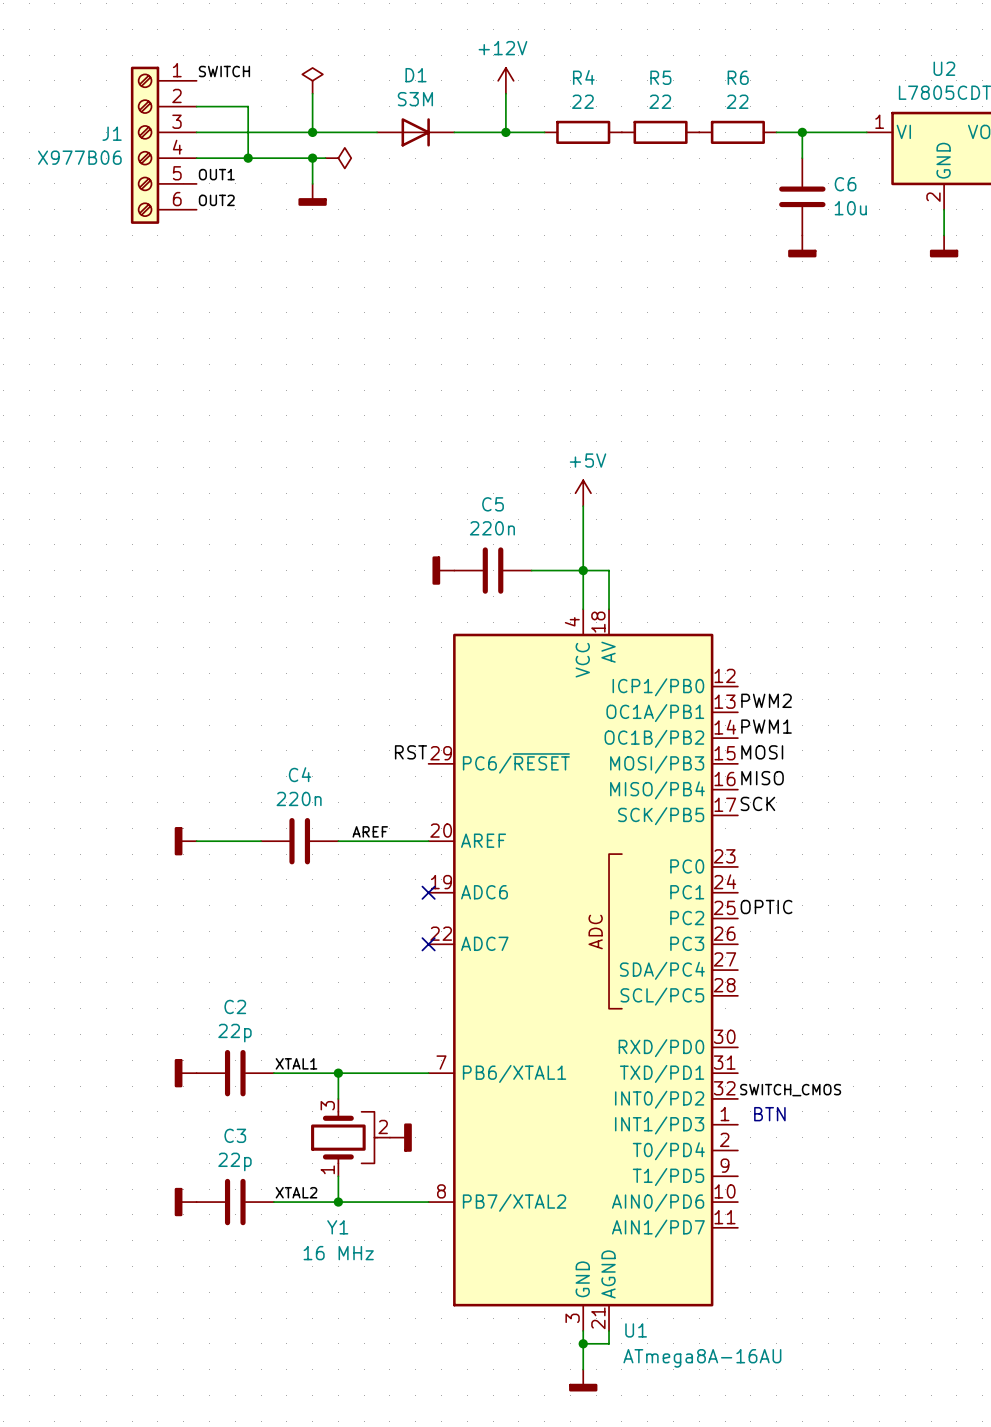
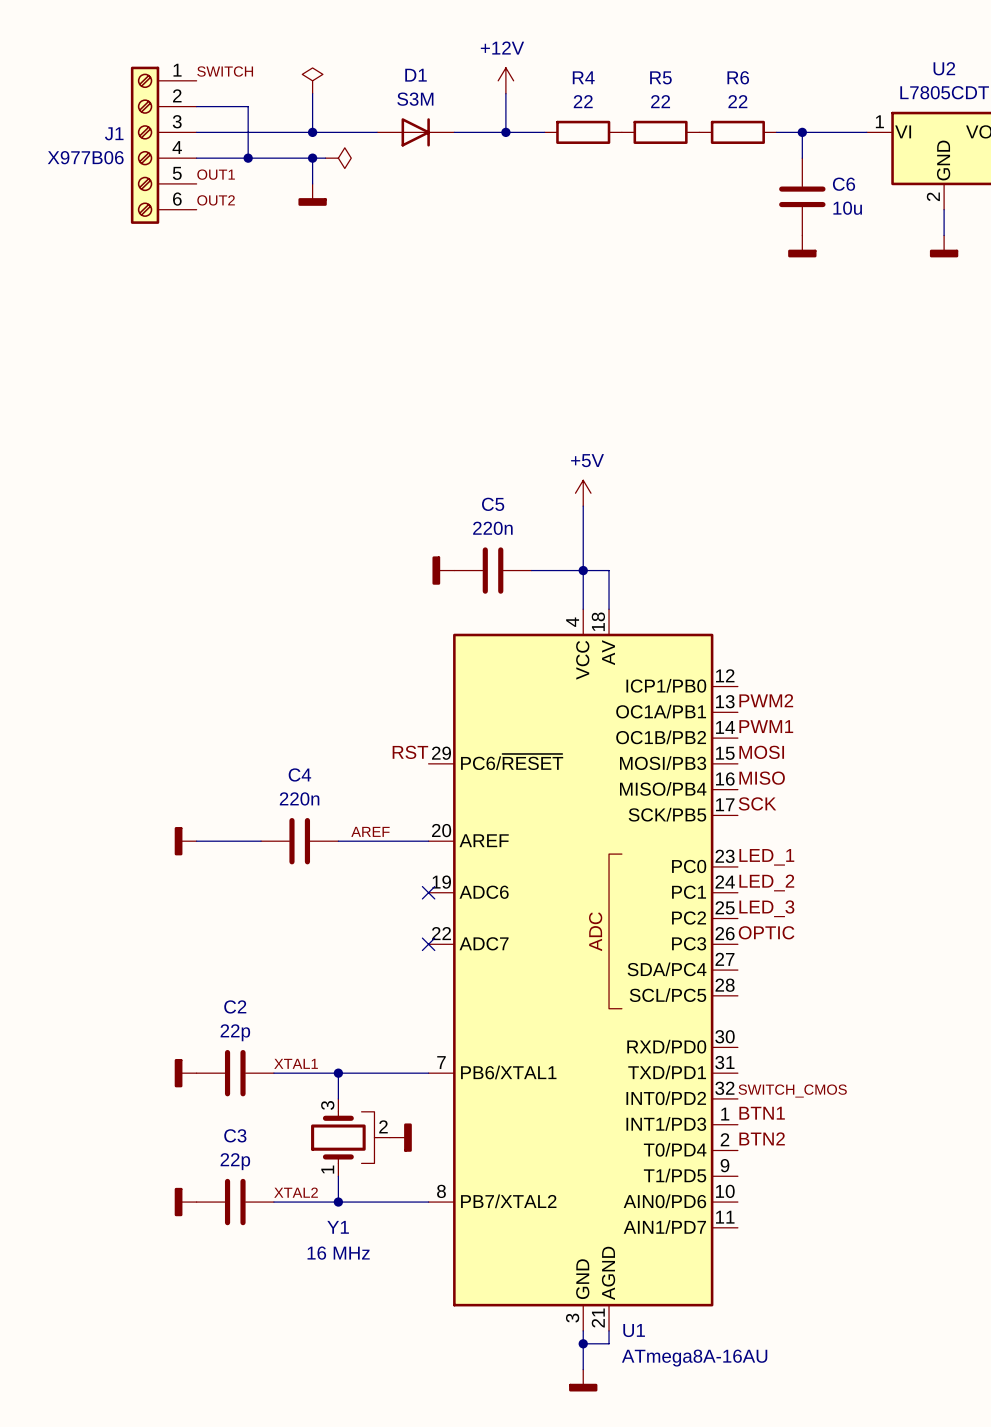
label: none -> LED_1 (766, 857)
label: none -> LED_2 (766, 883)
label: OPTIC (766, 907) -> LED_3 (766, 908)
label: none -> OPTIC (766, 932)
label: none -> BTN1 (762, 1113)
text: BTN (769, 1114) -> none
label: none -> BTN2 (762, 1138)

